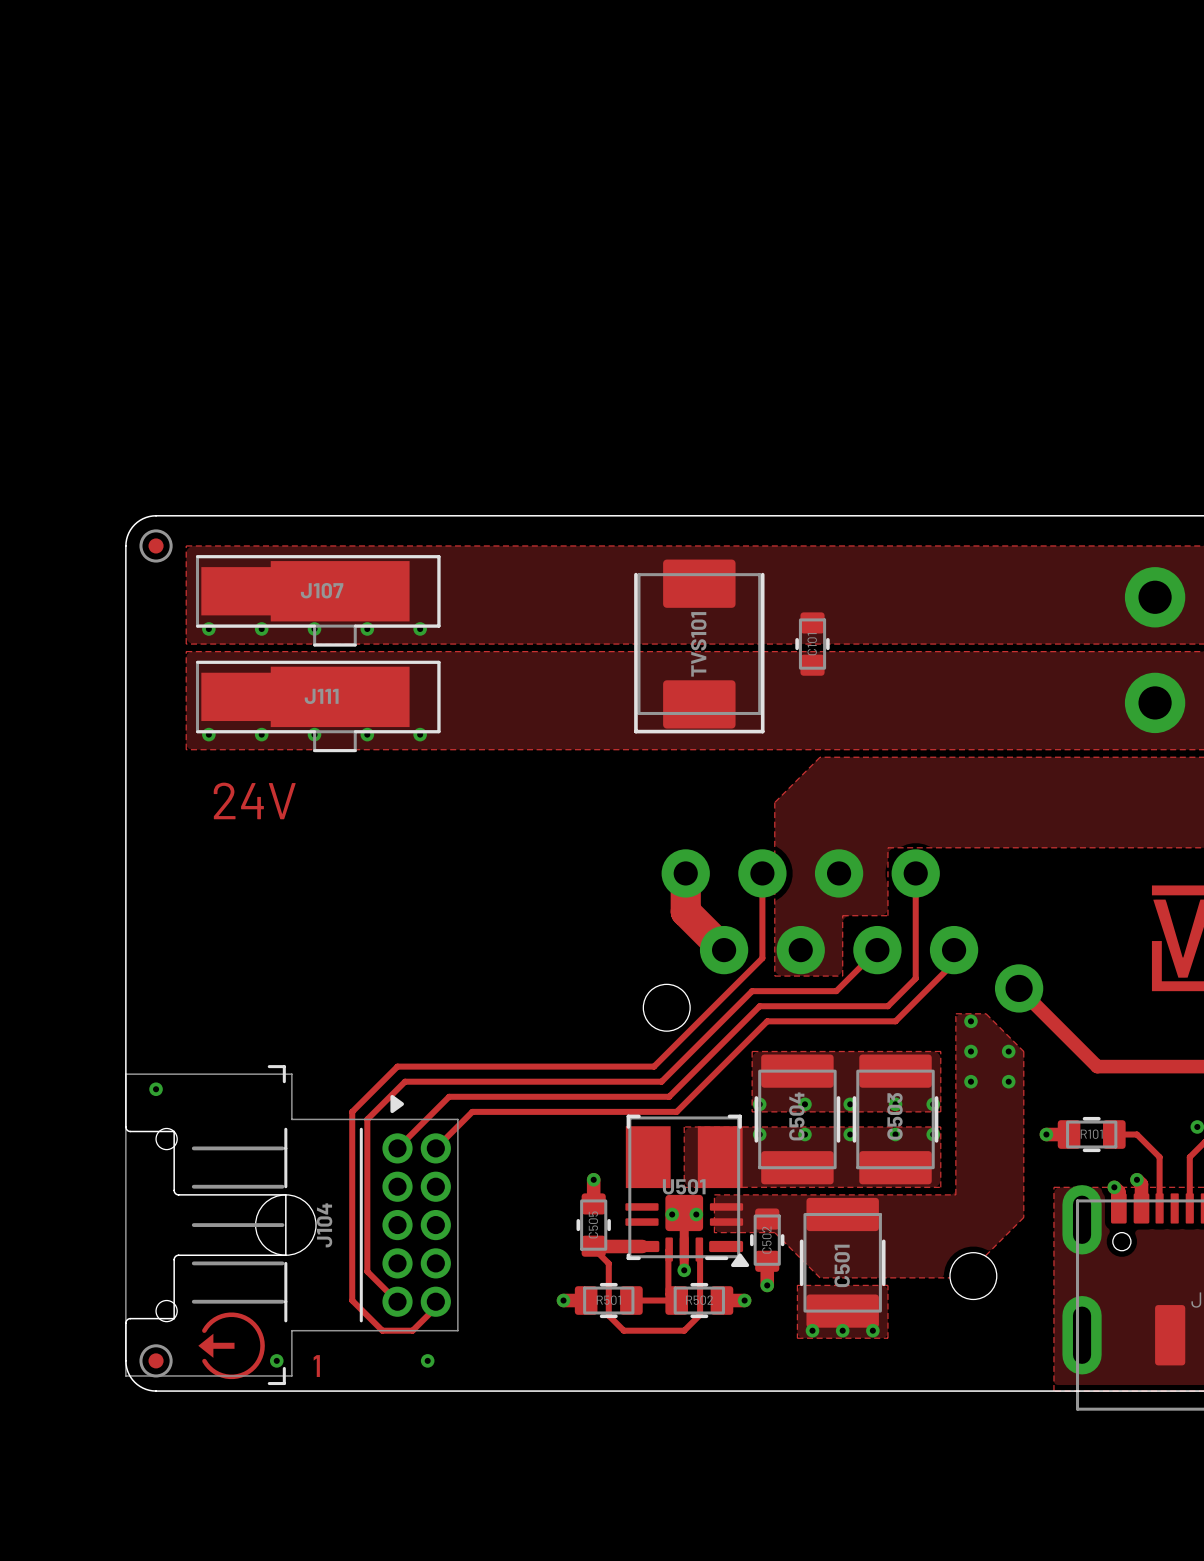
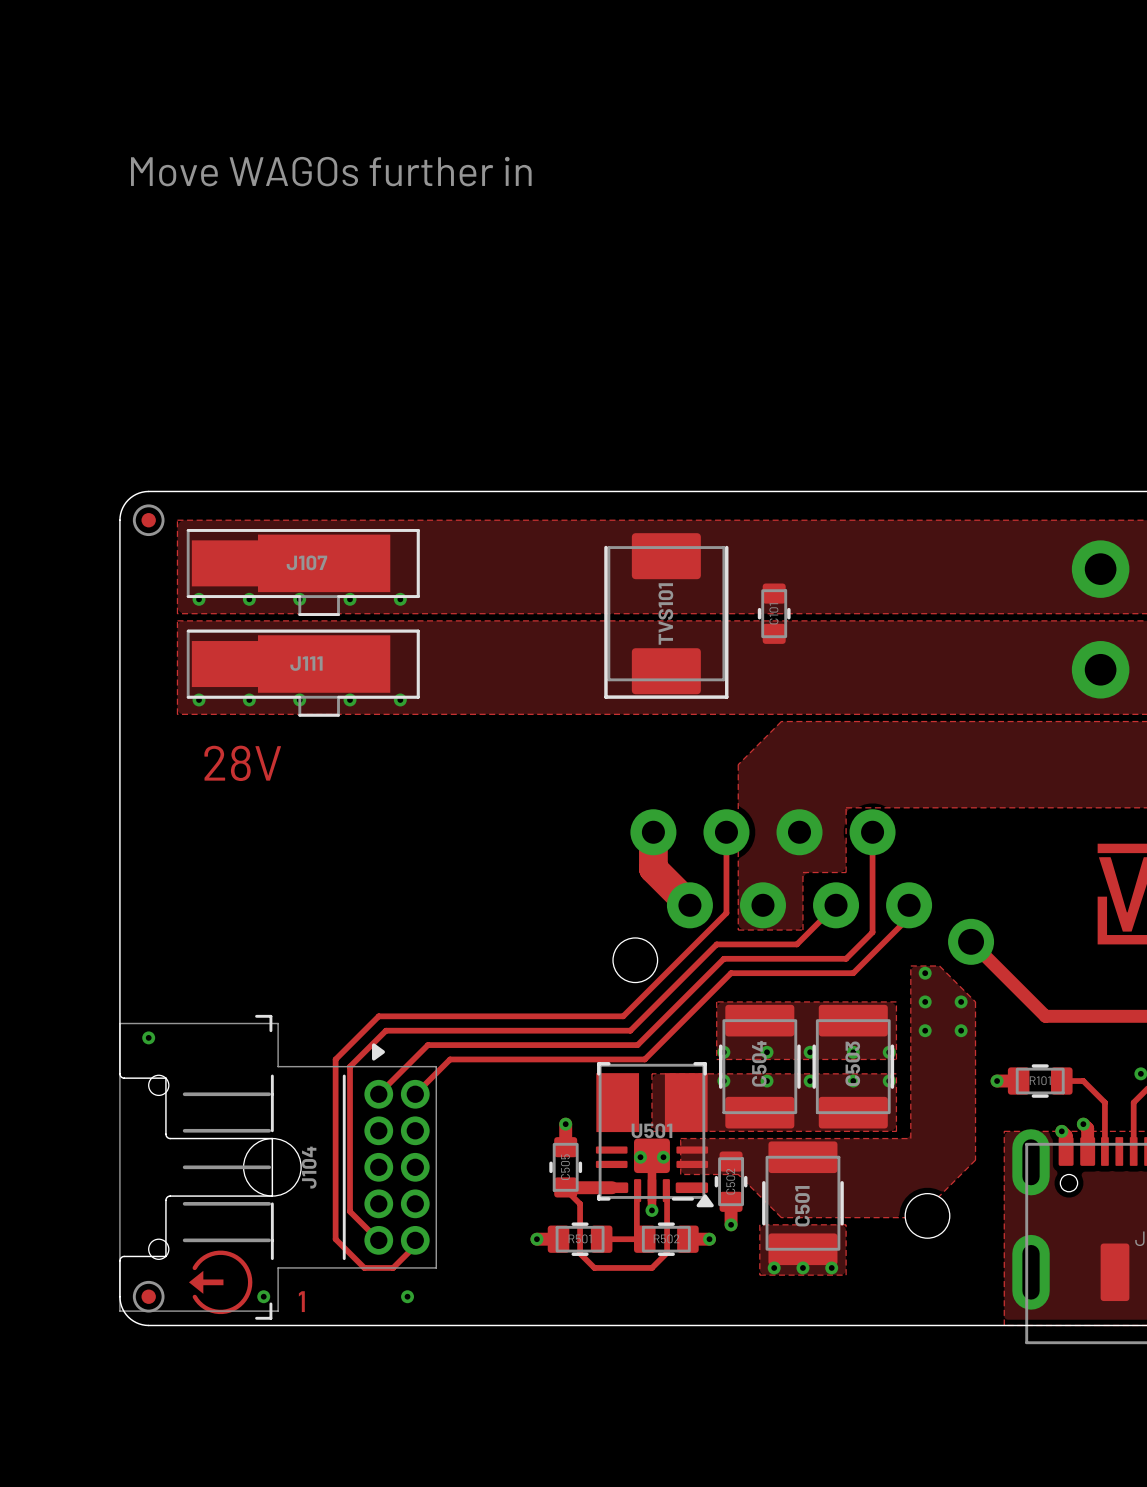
text: none -> Move WAGOs further in (331, 171)
drawing shape: [213, 782, 296, 820] -> [204, 745, 282, 782]

